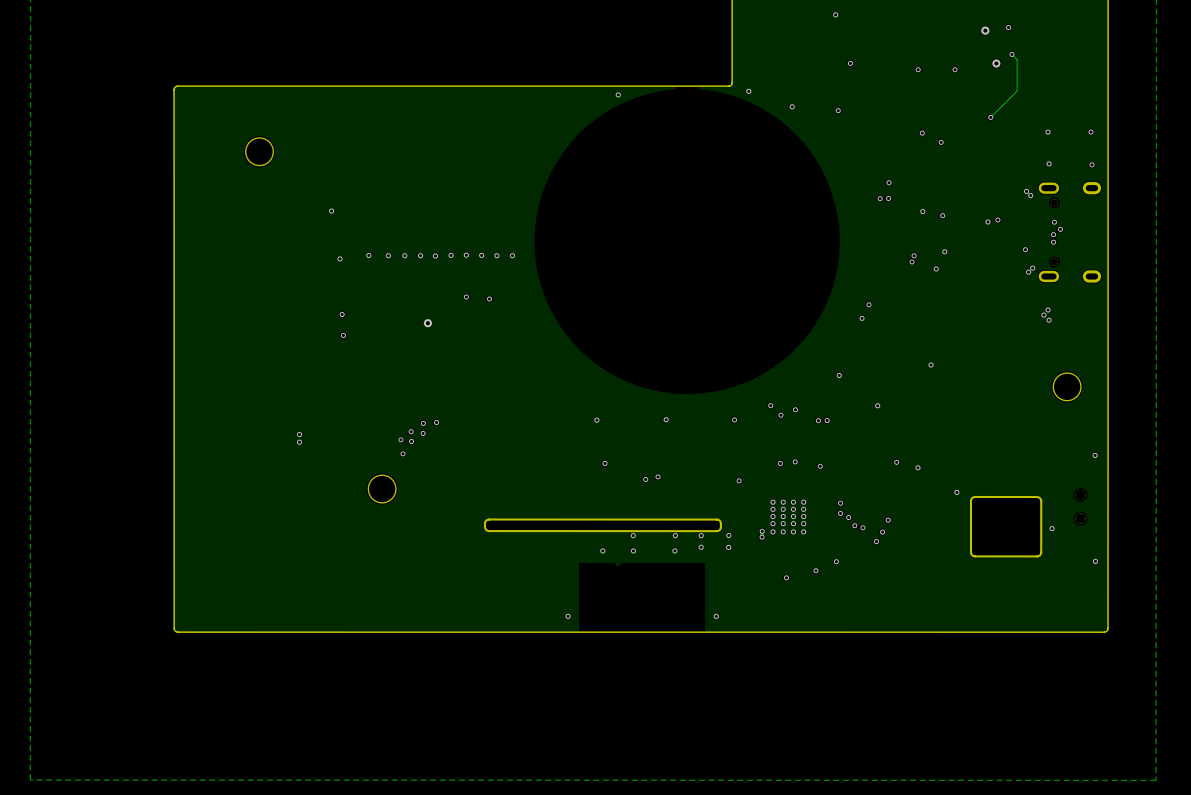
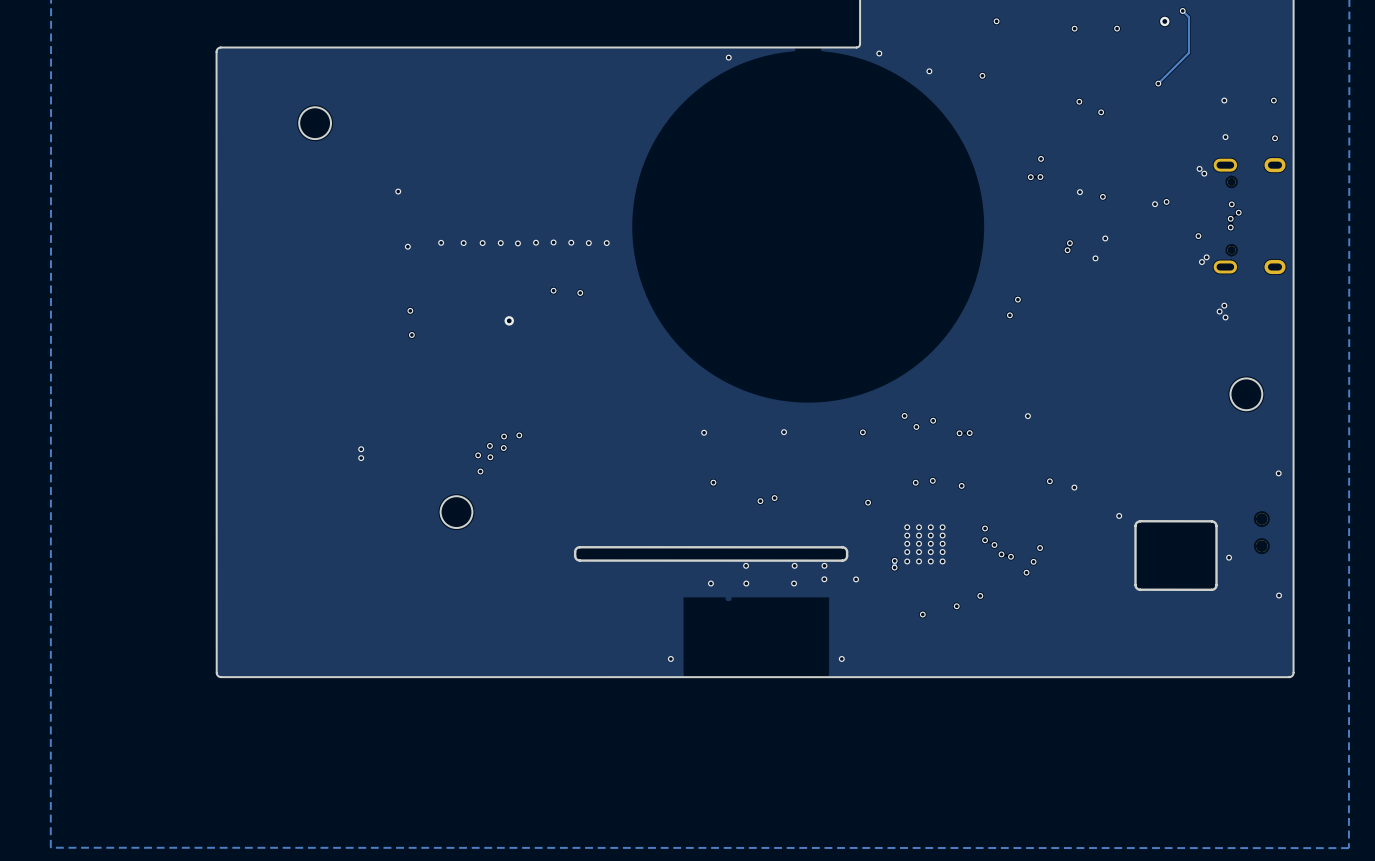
via: (931, 365) -> none
via: (839, 375) -> none
via: (728, 535) -> none

